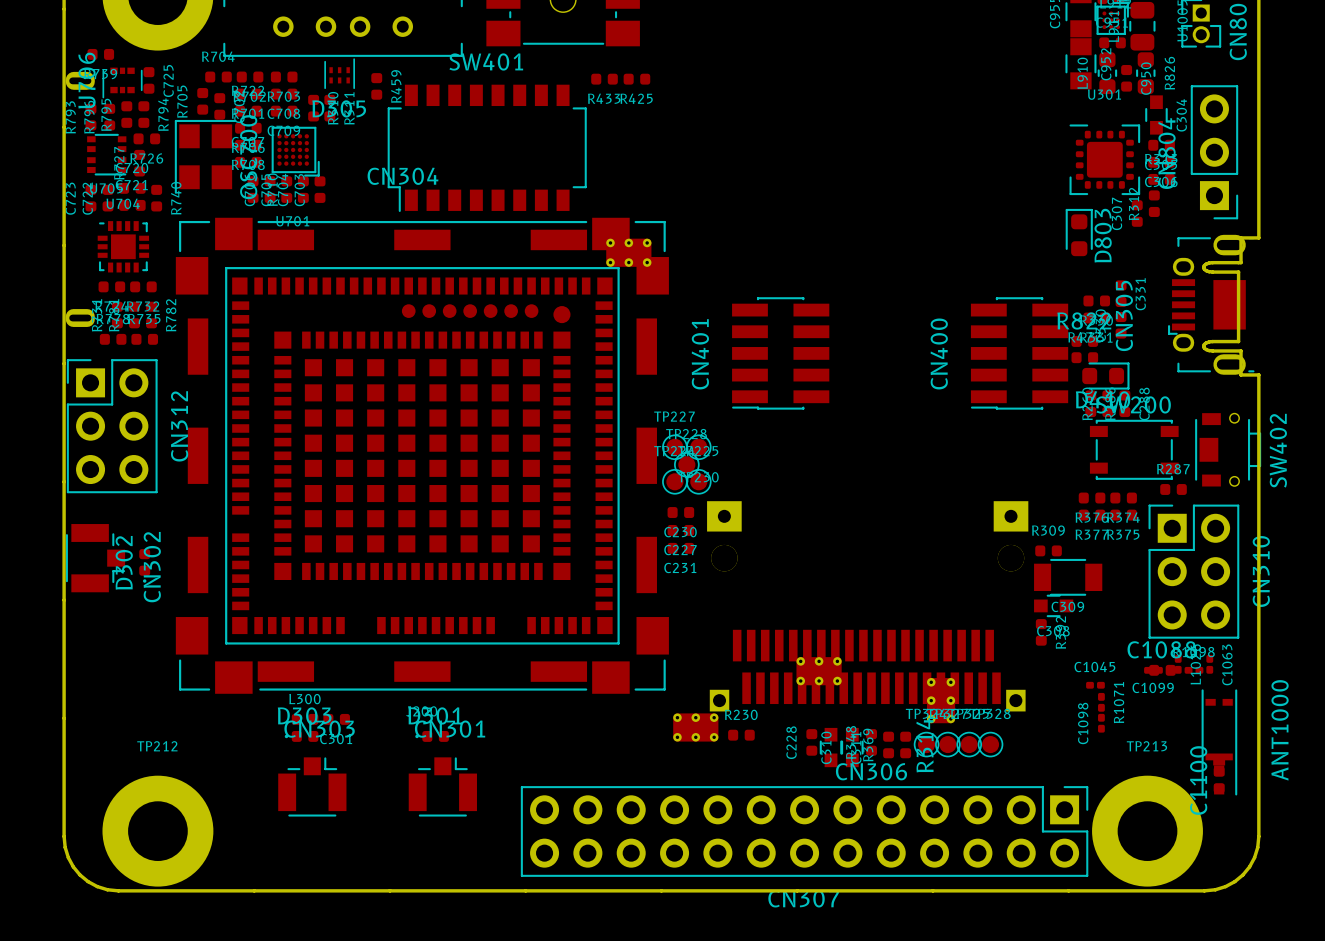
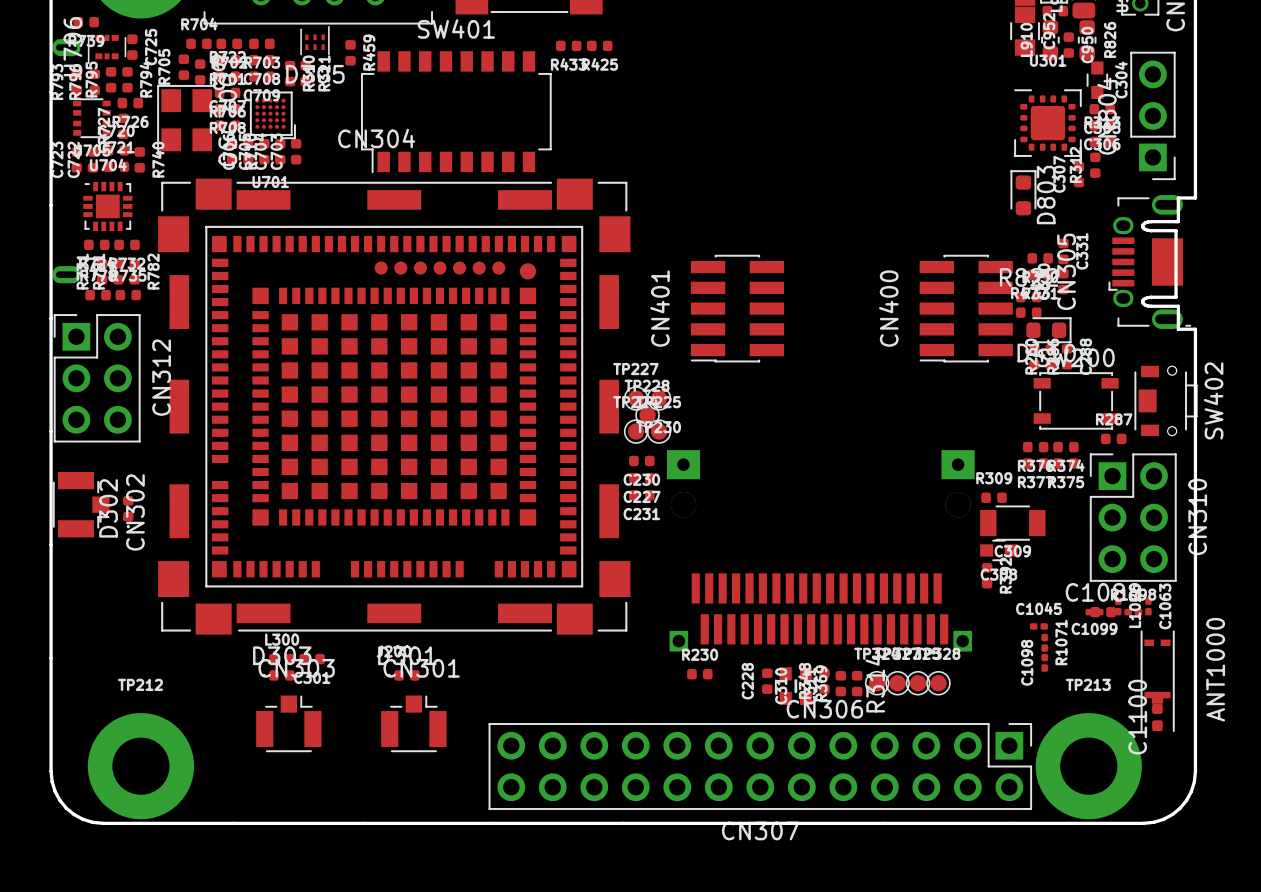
part: (628, 252) -> none
part: (819, 671) -> none
part: (941, 700) -> none
part: (695, 727) -> none

